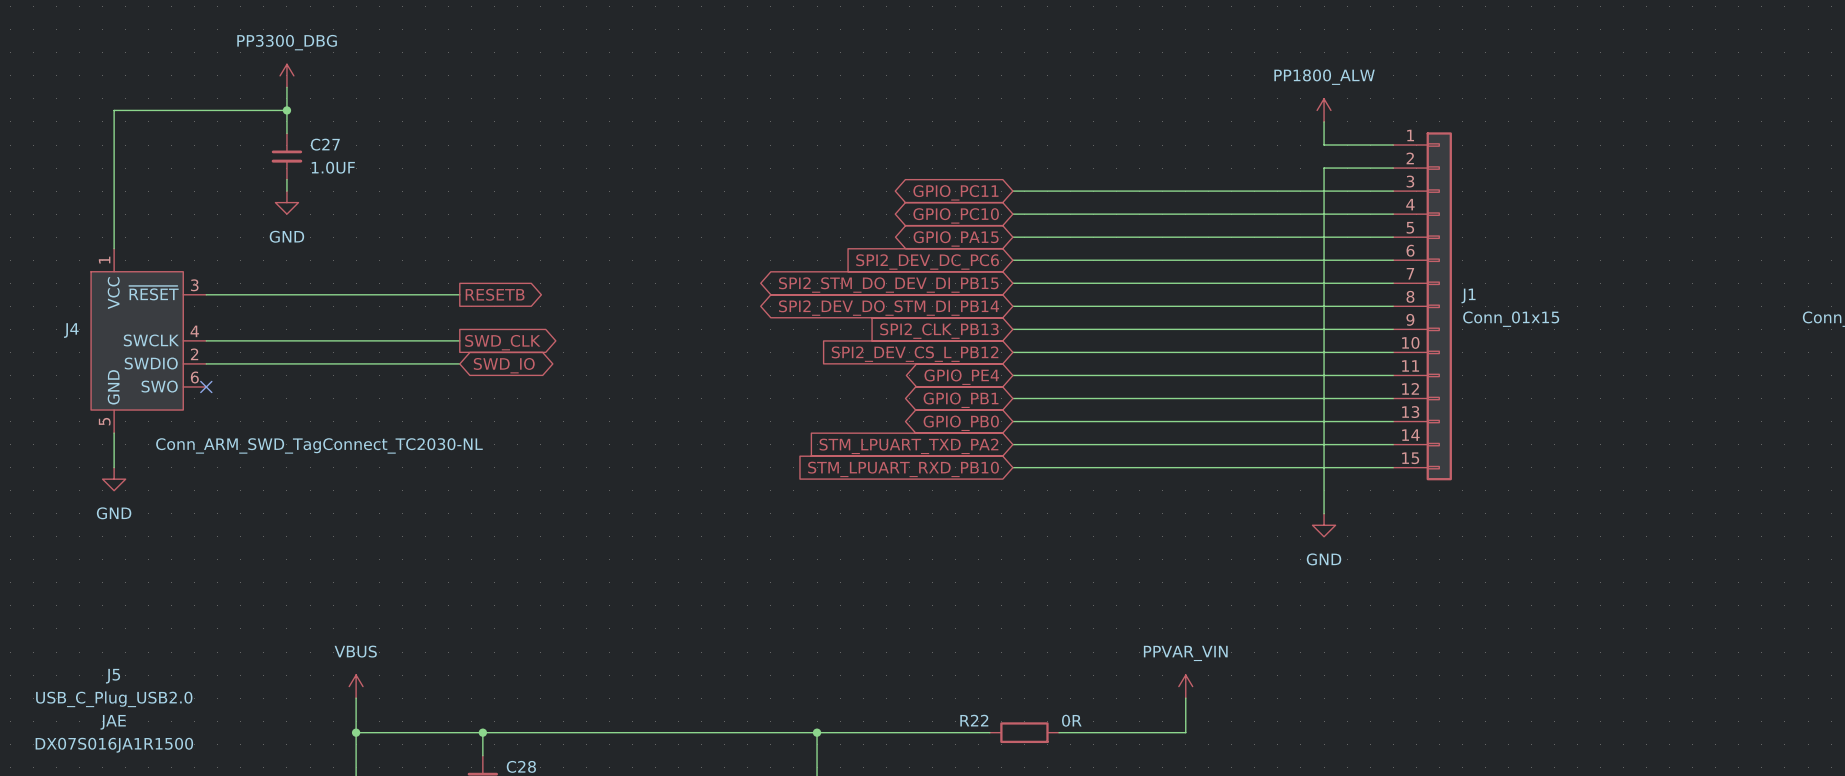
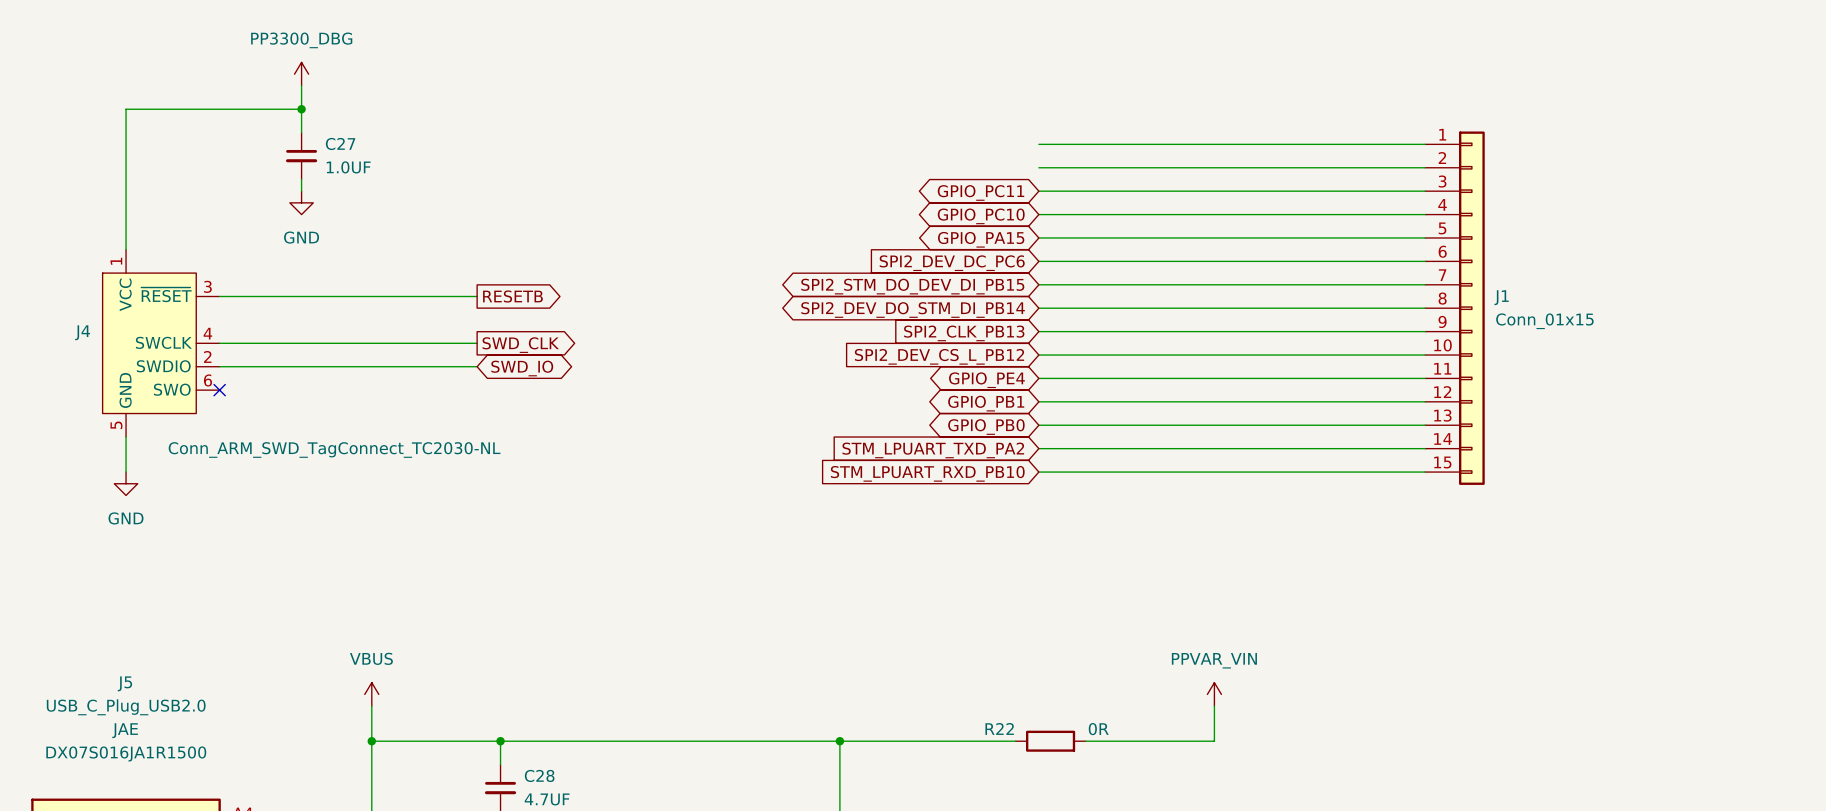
power symbol: PP1800_ALW (1324, 110) -> none
wire: (1324, 121) (1324, 145) -> (1038, 144) (1354, 144)
wire: (1324, 168) (1324, 513) -> (1354, 167) (1038, 167)
power symbol: GND (1324, 525) -> none

